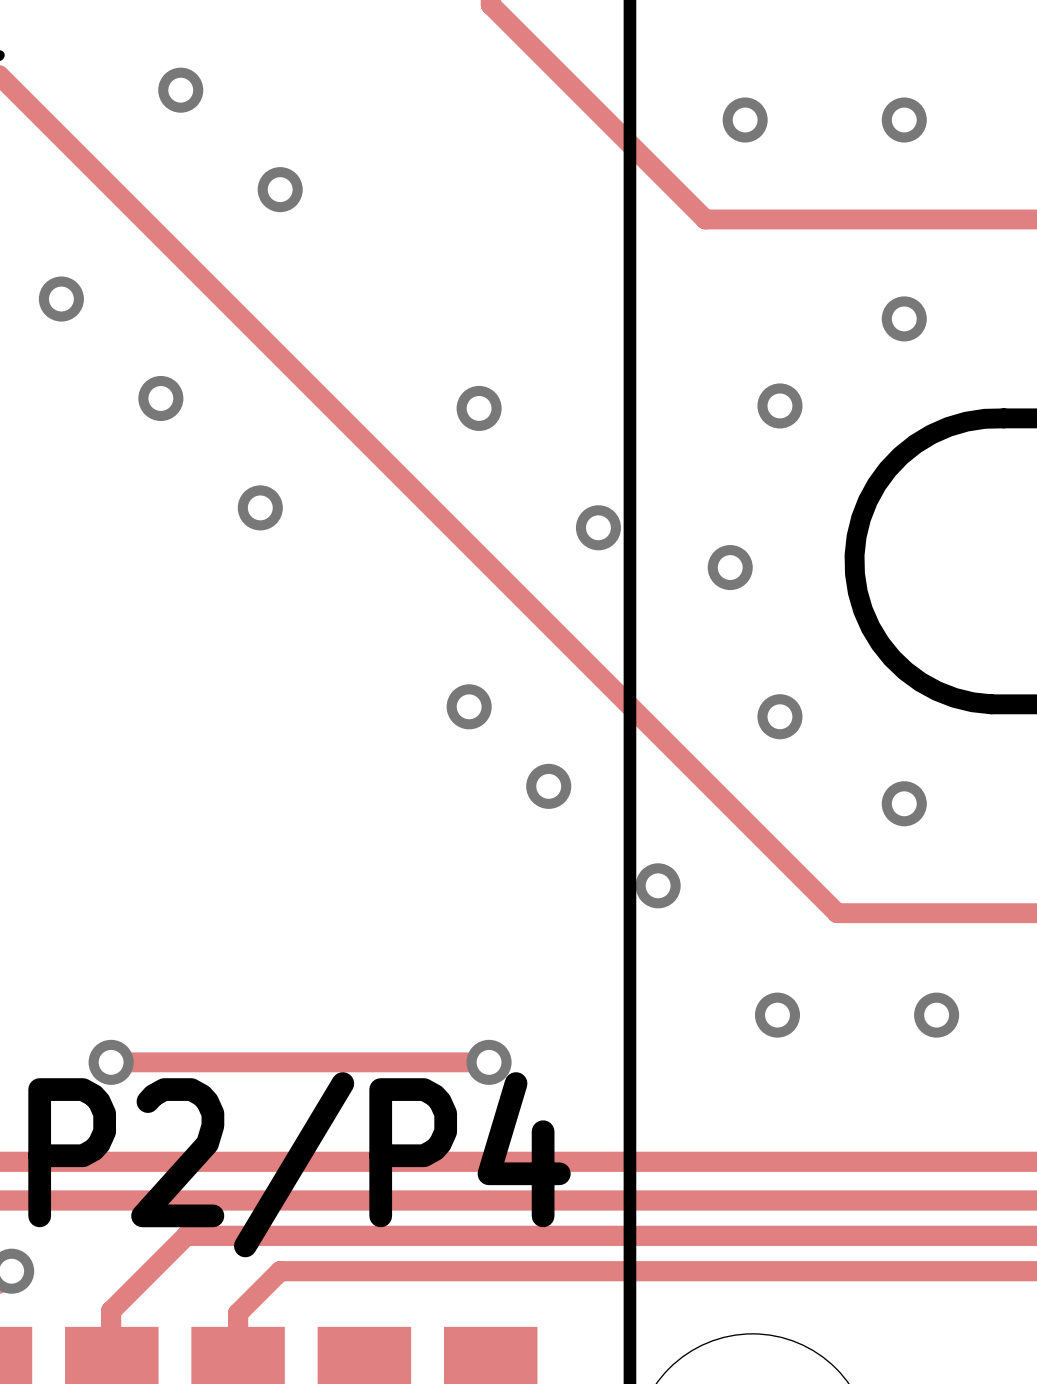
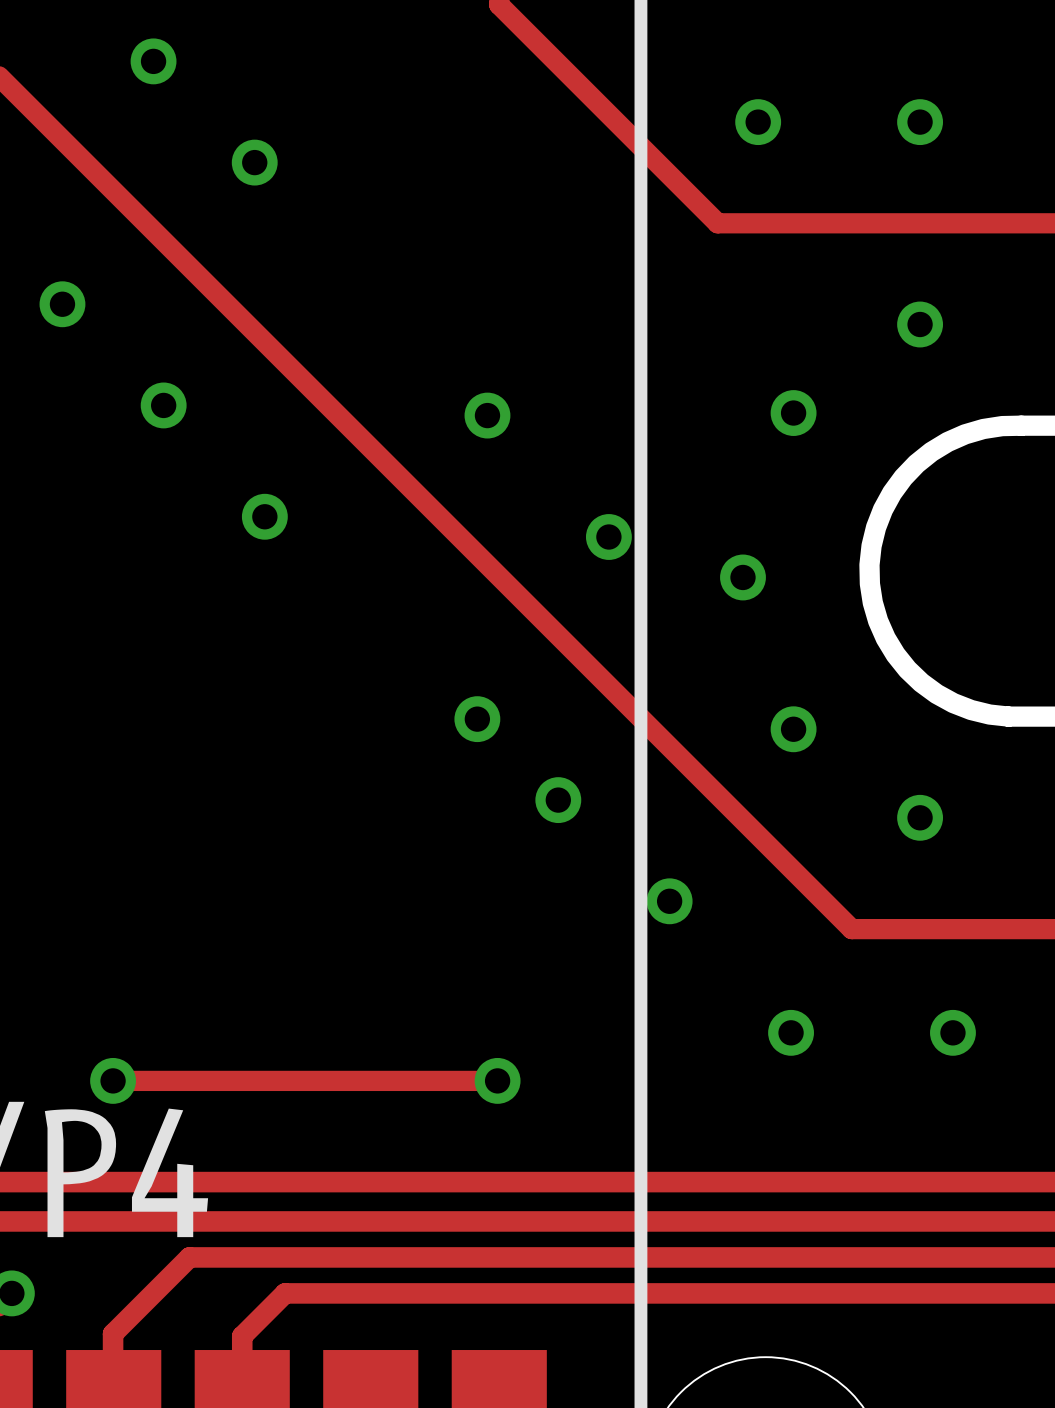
via position: (180, 90) -> (153, 61)
via position: (280, 189) -> (254, 162)

